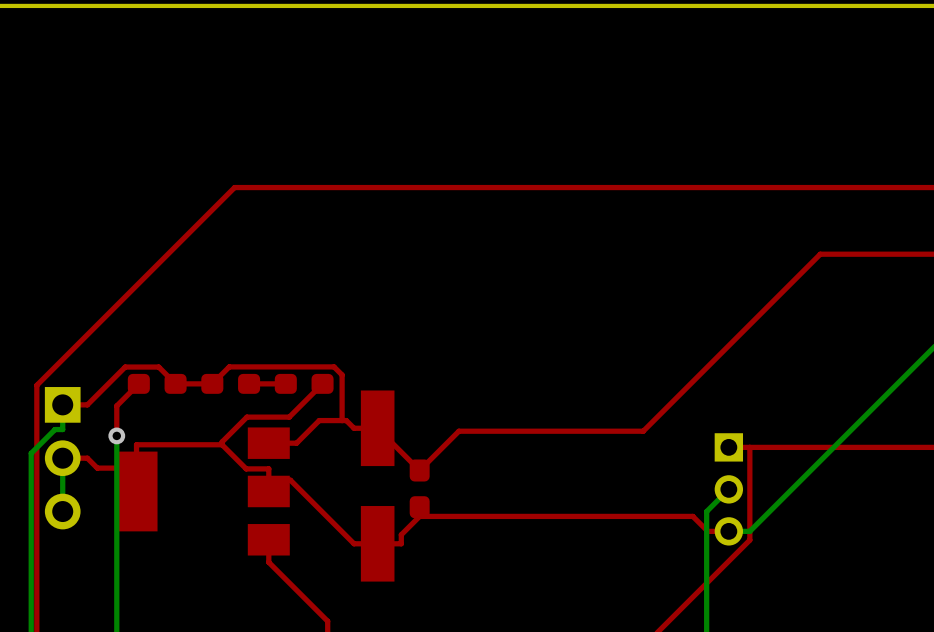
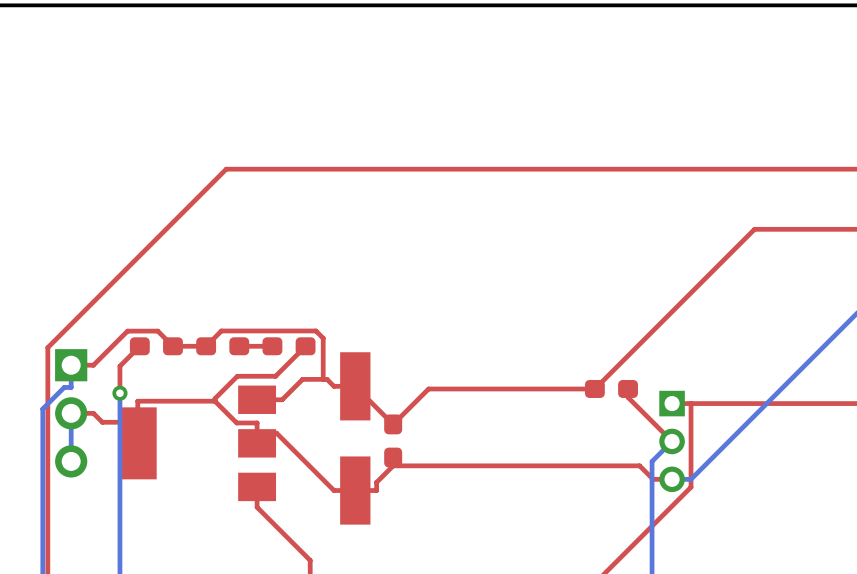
part: none -> (611, 388)
top track: none -> (628, 388) (628, 397) (672, 441)

